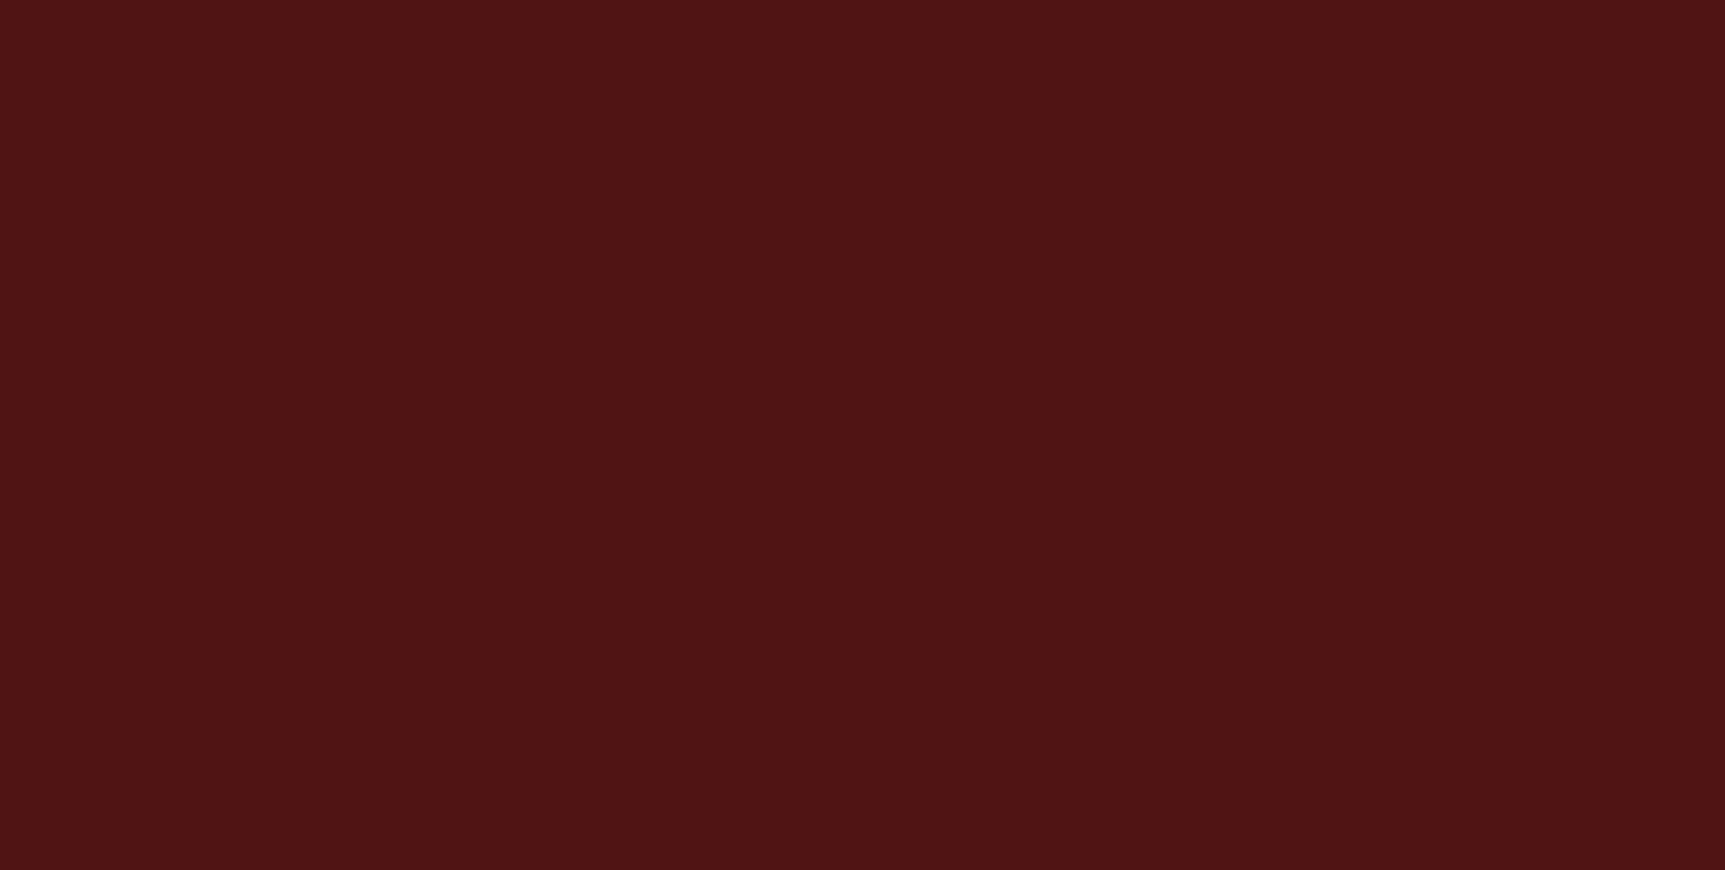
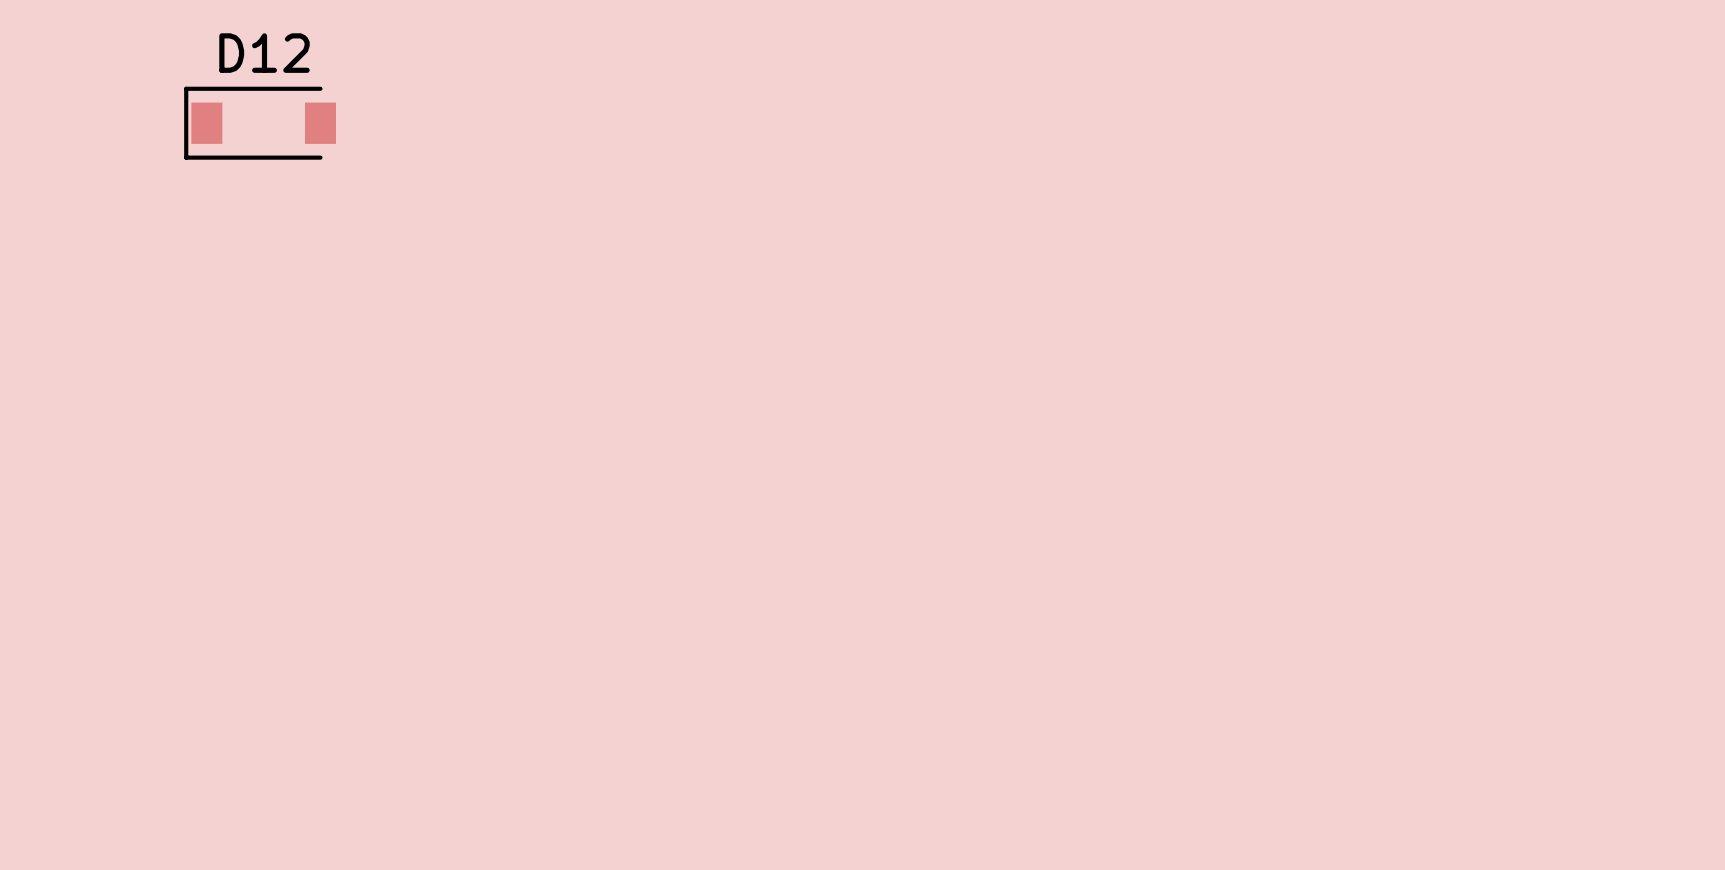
D12: none -> (260, 123)

